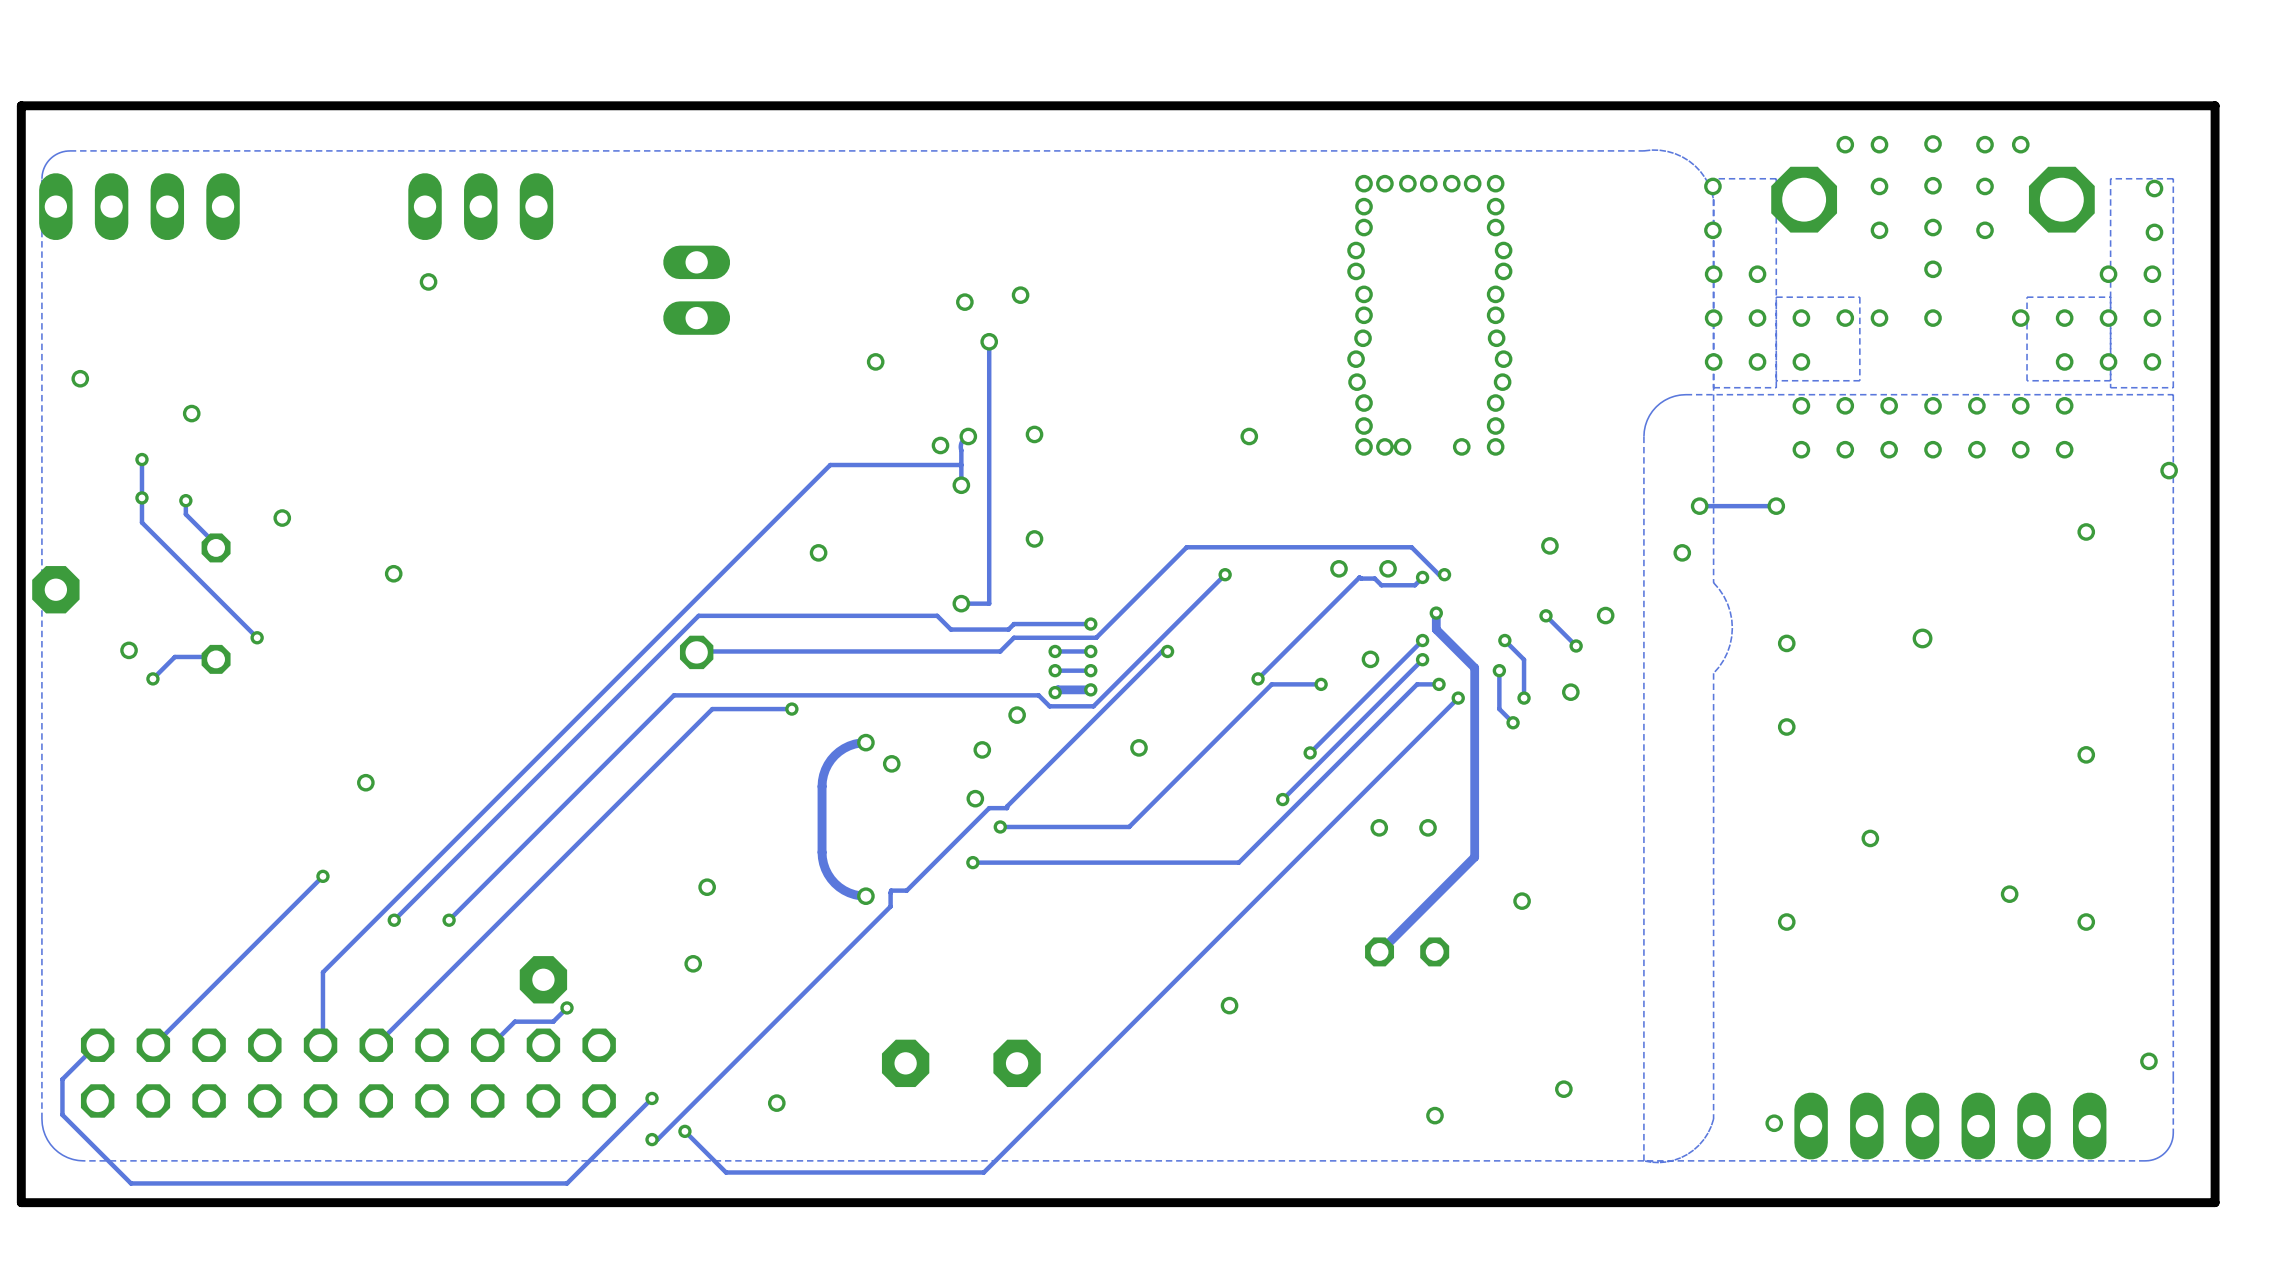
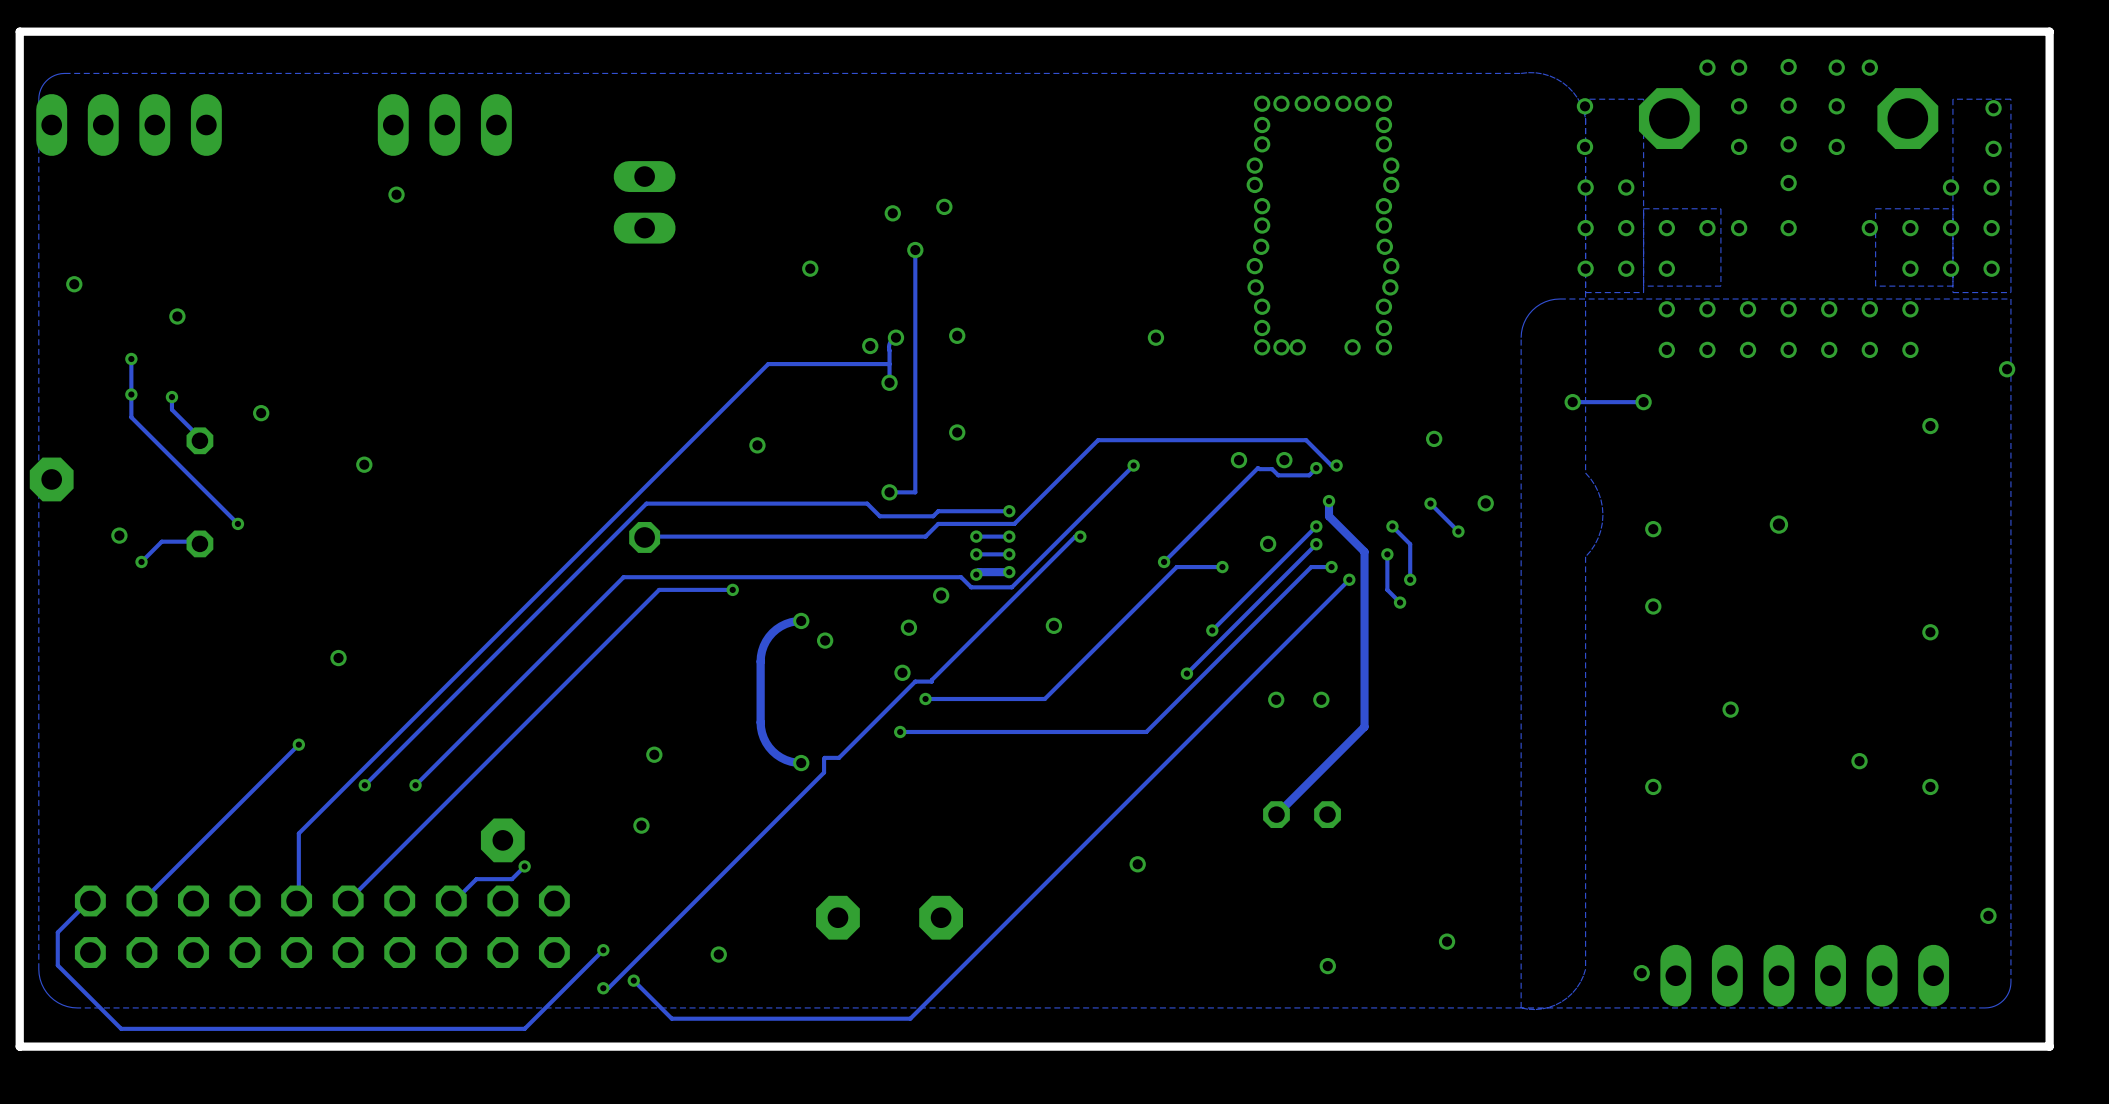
via: (1682, 552) -> none
via: (1570, 692) -> none
via: (1522, 901) -> none

